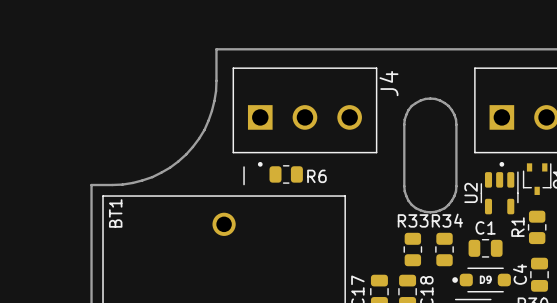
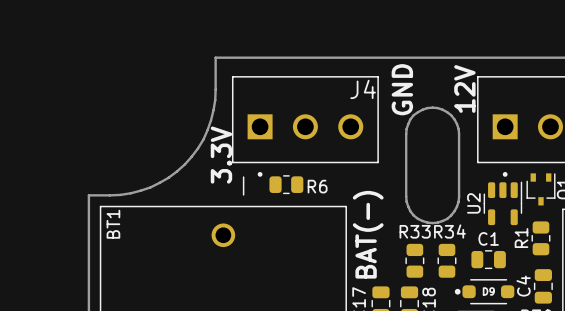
text: none -> GND (402, 89)
text: none -> 12V (464, 88)
J4 name rotation: 0° (388, 83) -> 90° clockwise (363, 89)
text: none -> 3.3V (221, 155)
text: none -> BAT(-) (368, 234)

